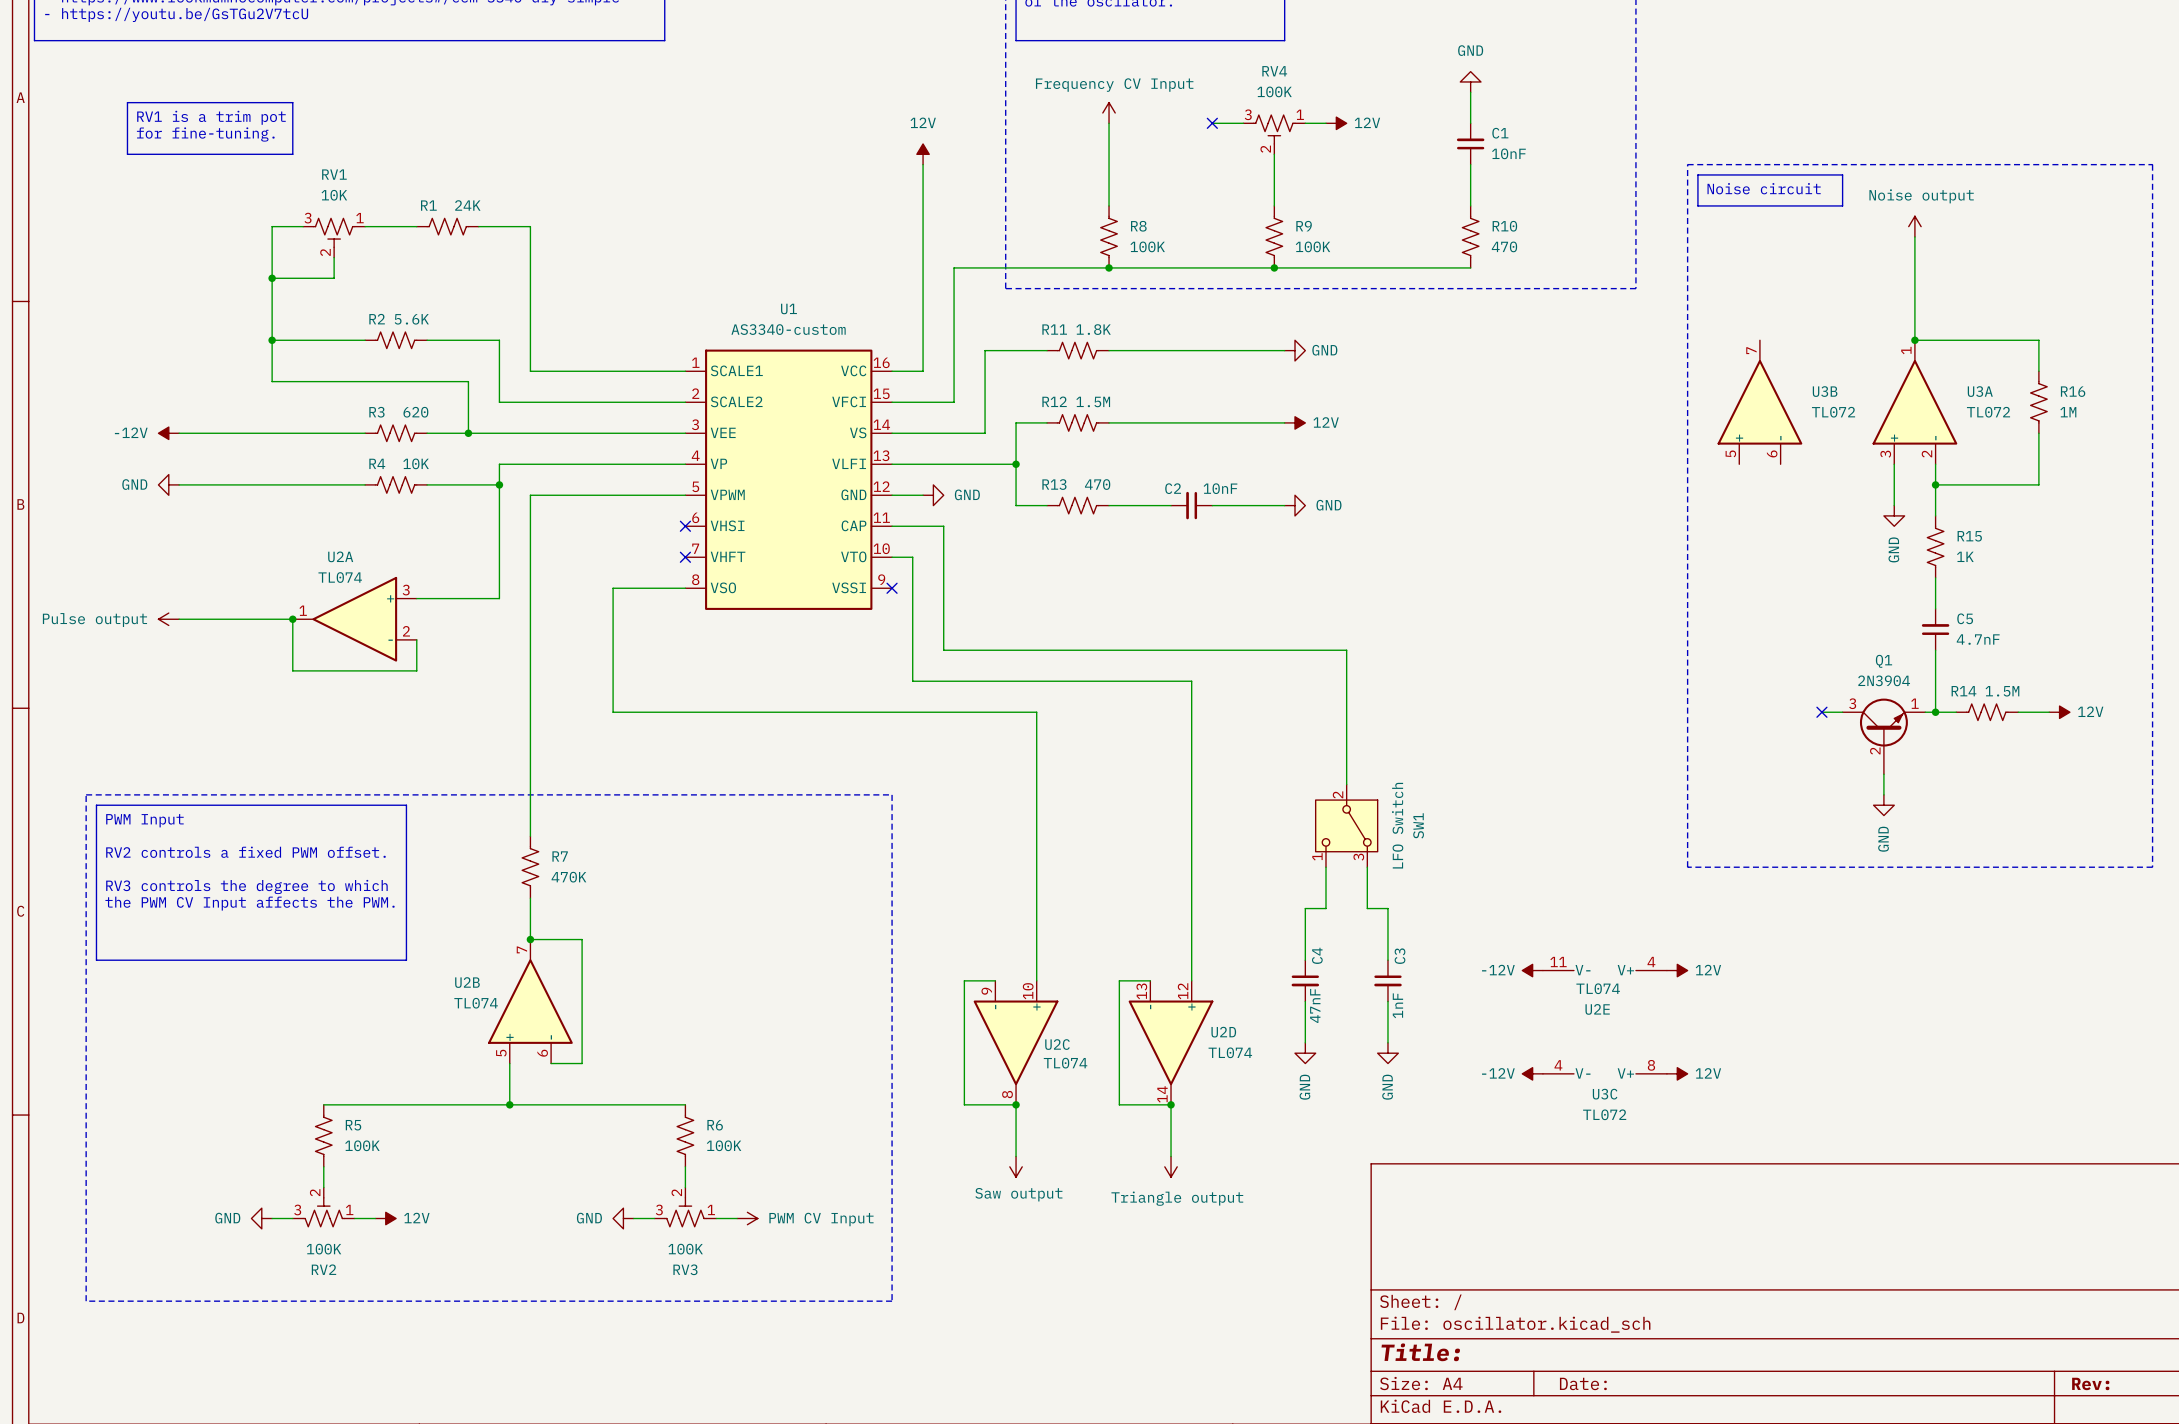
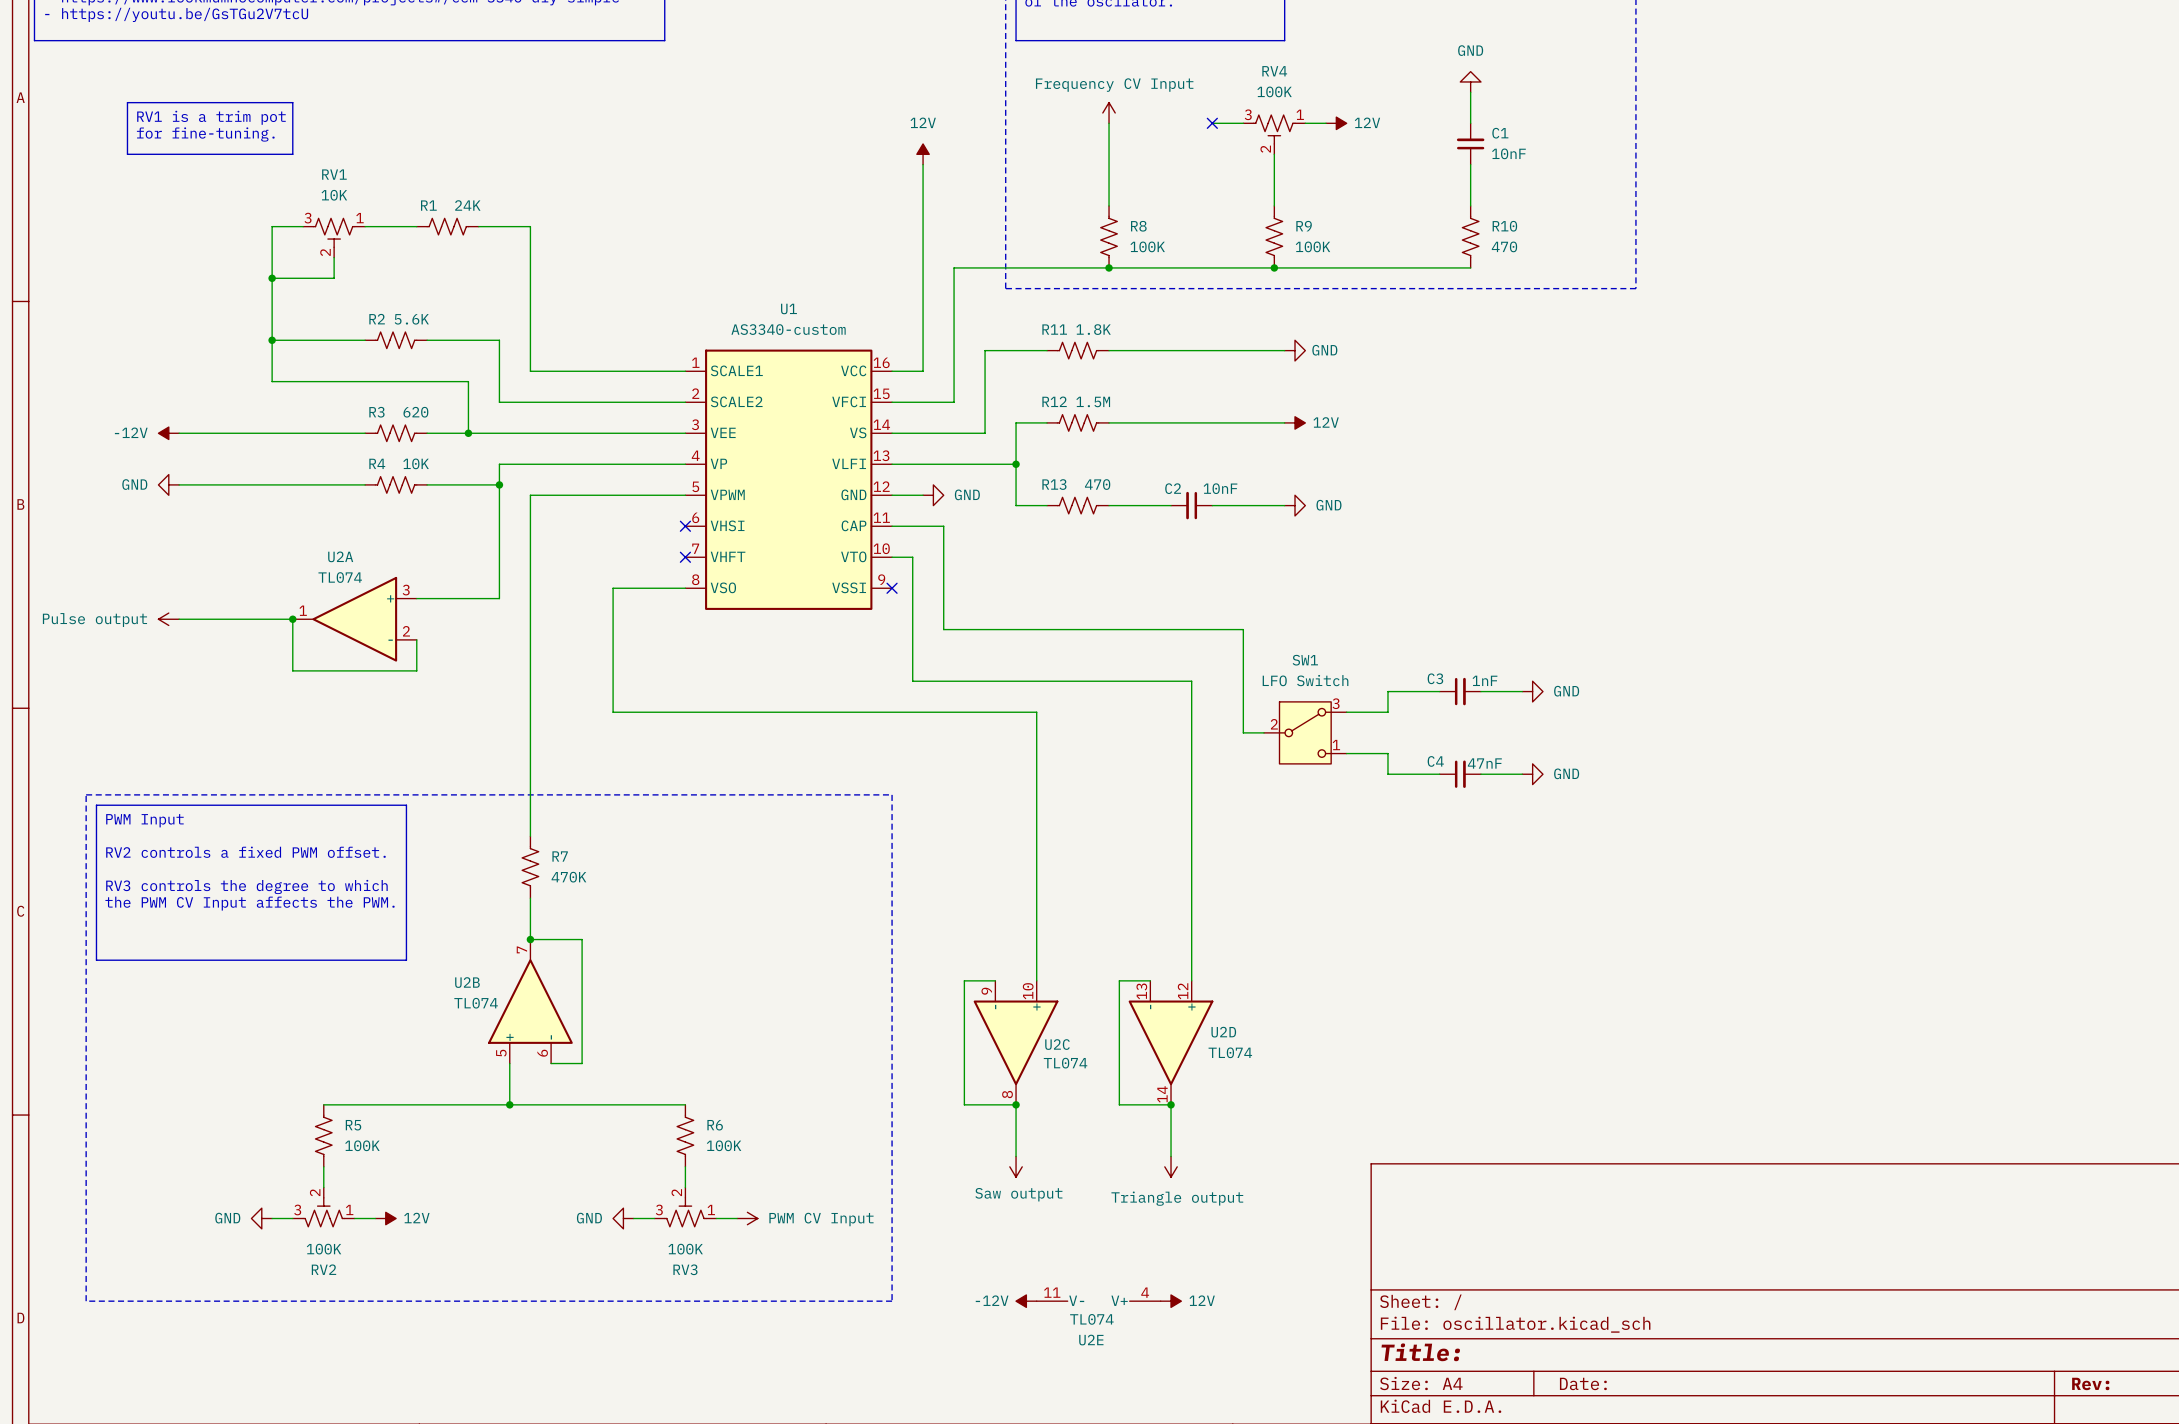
line: (1687, 164) (2152, 164) (2152, 867) (1687, 867) (1687, 164) -> none
line: (1697, 174) (1842, 174) (1842, 205) (1697, 205) (1697, 174) -> none
text: Noise circuit (1764, 188) -> none
power symbol: Noise output (1914, 226) -> none
wire: (1914, 236) (1914, 340) (2038, 340) (2038, 371) -> none
junction: (1914, 340) -> none
U3B: TL072 (1759, 402) -> none
U3A: TL072 (1914, 402) -> none
R16: 1M (2038, 402) -> none
wire: (2038, 433) (2038, 484) (1935, 484) -> none
wire: (1894, 464) (1894, 505) -> none
wire: (1935, 464) (1935, 515) -> none
junction: (1935, 484) -> none
power symbol: GND (1894, 515) -> none
R15: 1K (1935, 546) -> none
wire: (1935, 577) (1935, 608) -> none
wire: (943, 629) (943, 650) (1346, 650) (1346, 784) -> (943, 629) (1243, 629) (1243, 732) (1264, 732)
C5: 4.7nF (1935, 629) -> none
wire: (1935, 650) (1935, 712) -> none
wire: none -> (1439, 691) (1387, 691) (1387, 712) (1346, 712)
wire: none -> (1480, 691) (1522, 691)
power symbol: none -> GND (1532, 691)
wire: (1821, 712) (1842, 712) -> none
no-connect mark: (1821, 712) -> none
wire: (1925, 712) (1956, 712) -> none
junction: (1935, 712) -> none
R14: 1.5M (1987, 712) -> none
wire: (2018, 712) (2049, 712) -> none
power symbol: 12V (2059, 712) -> none
Q1: 2N3904 (1883, 736) -> none
wire: none -> (1346, 753) (1387, 753) (1387, 774) (1439, 774)
wire: none -> (1480, 774) (1522, 774)
power symbol: none -> GND (1532, 774)
wire: (1883, 774) (1883, 794) -> none
power symbol: GND (1883, 805) -> none
SW1 rotation: 0° (1346, 825) -> 90° counterclockwise (1305, 732)
SW1 position: (1346, 825) -> (1305, 732)
wire: (1325, 867) (1325, 908) (1305, 908) (1305, 960) -> none
wire: (1367, 867) (1367, 908) (1387, 908) (1387, 960) -> none
power symbol: -12V (1532, 970) -> none
U2E position: (1604, 970) -> (1098, 1301)
power symbol: 12V (1677, 970) -> none
C4 rotation: 0° (1305, 980) -> 90° counterclockwise (1460, 774)
C4 position: (1305, 980) -> (1460, 774)
C3 rotation: 0° (1387, 980) -> 90° counterclockwise (1460, 691)
C3 position: (1387, 980) -> (1460, 691)
wire: (1305, 1001) (1305, 1042) -> none
wire: (1387, 1001) (1387, 1042) -> none
power symbol: GND (1305, 1053) -> none
power symbol: GND (1387, 1053) -> none
power symbol: -12V (1532, 1073) -> none
U3C: TL072 (1604, 1073) -> none
power symbol: 12V (1677, 1073) -> none
power symbol: none -> -12V (1026, 1301)
power symbol: none -> 12V (1171, 1301)

